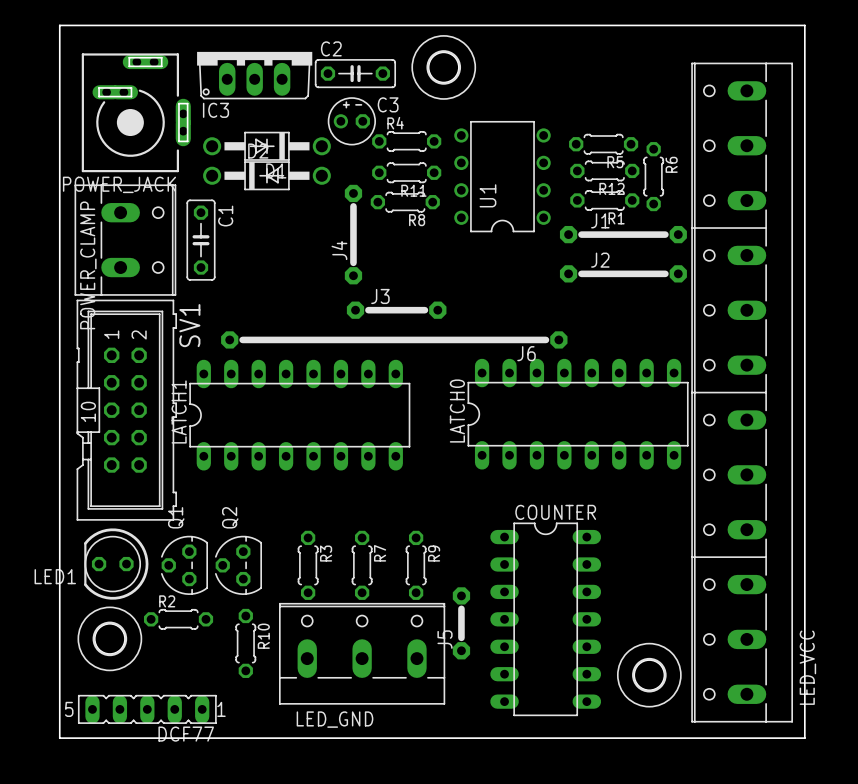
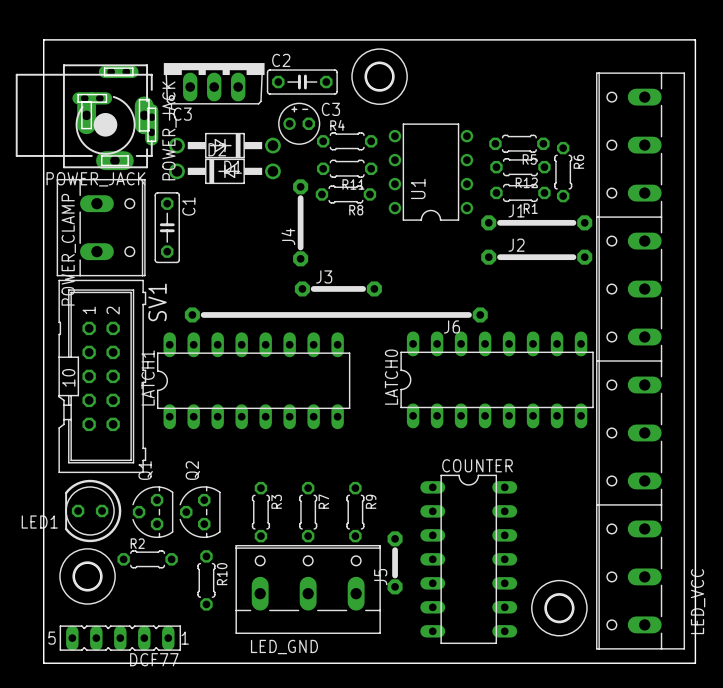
POWER_JACK: none -> (84, 121)

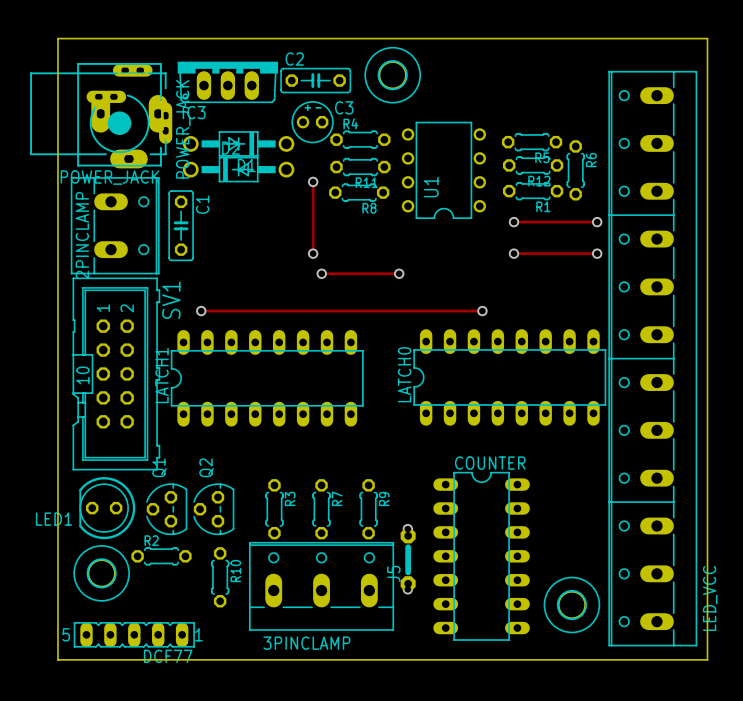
track: none -> (313, 181) (313, 253)
via: none -> (313, 181)
J4: (300, 222) -> none
J1: (536, 222) -> none
track: none -> (513, 222) (597, 222)
via: none -> (513, 222)
via: none -> (597, 222)
POWER_CLAMP name: POWER_CLAMP (68, 249) -> 2PINCLAMP (82, 235)
via: none -> (313, 253)
track: none -> (513, 253) (597, 253)
via: none -> (513, 253)
via: none -> (597, 253)
J2: (536, 257) -> none
track: none -> (321, 273) (399, 273)
via: none -> (321, 273)
via: none -> (399, 273)
J3: (338, 288) -> none
track: none -> (201, 311) (482, 311)
via: none -> (201, 311)
via: none -> (482, 311)
J6: (336, 314) -> none
via: none -> (407, 529)
via: none -> (407, 589)
LED_GND name: LED_GND (284, 647) -> 3PINCLAMP (306, 643)

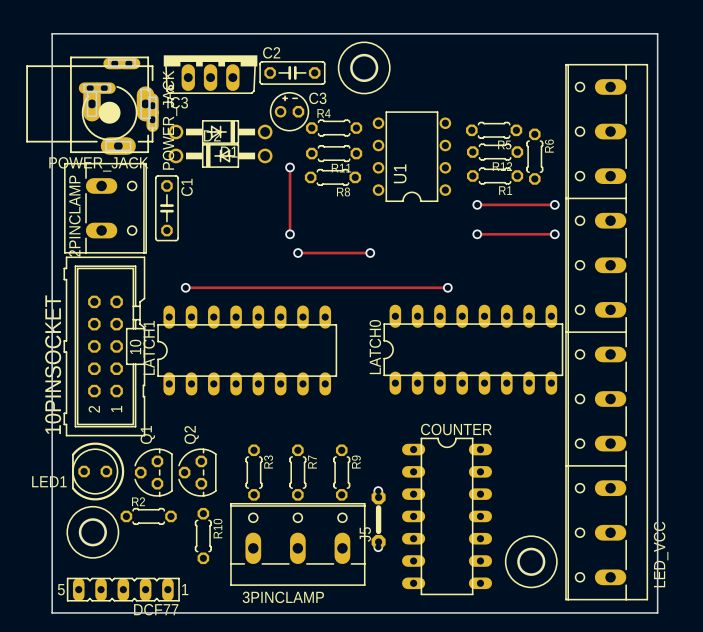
10PINSOCKET: none -> (104, 346)
SV1: (116, 373) -> none

